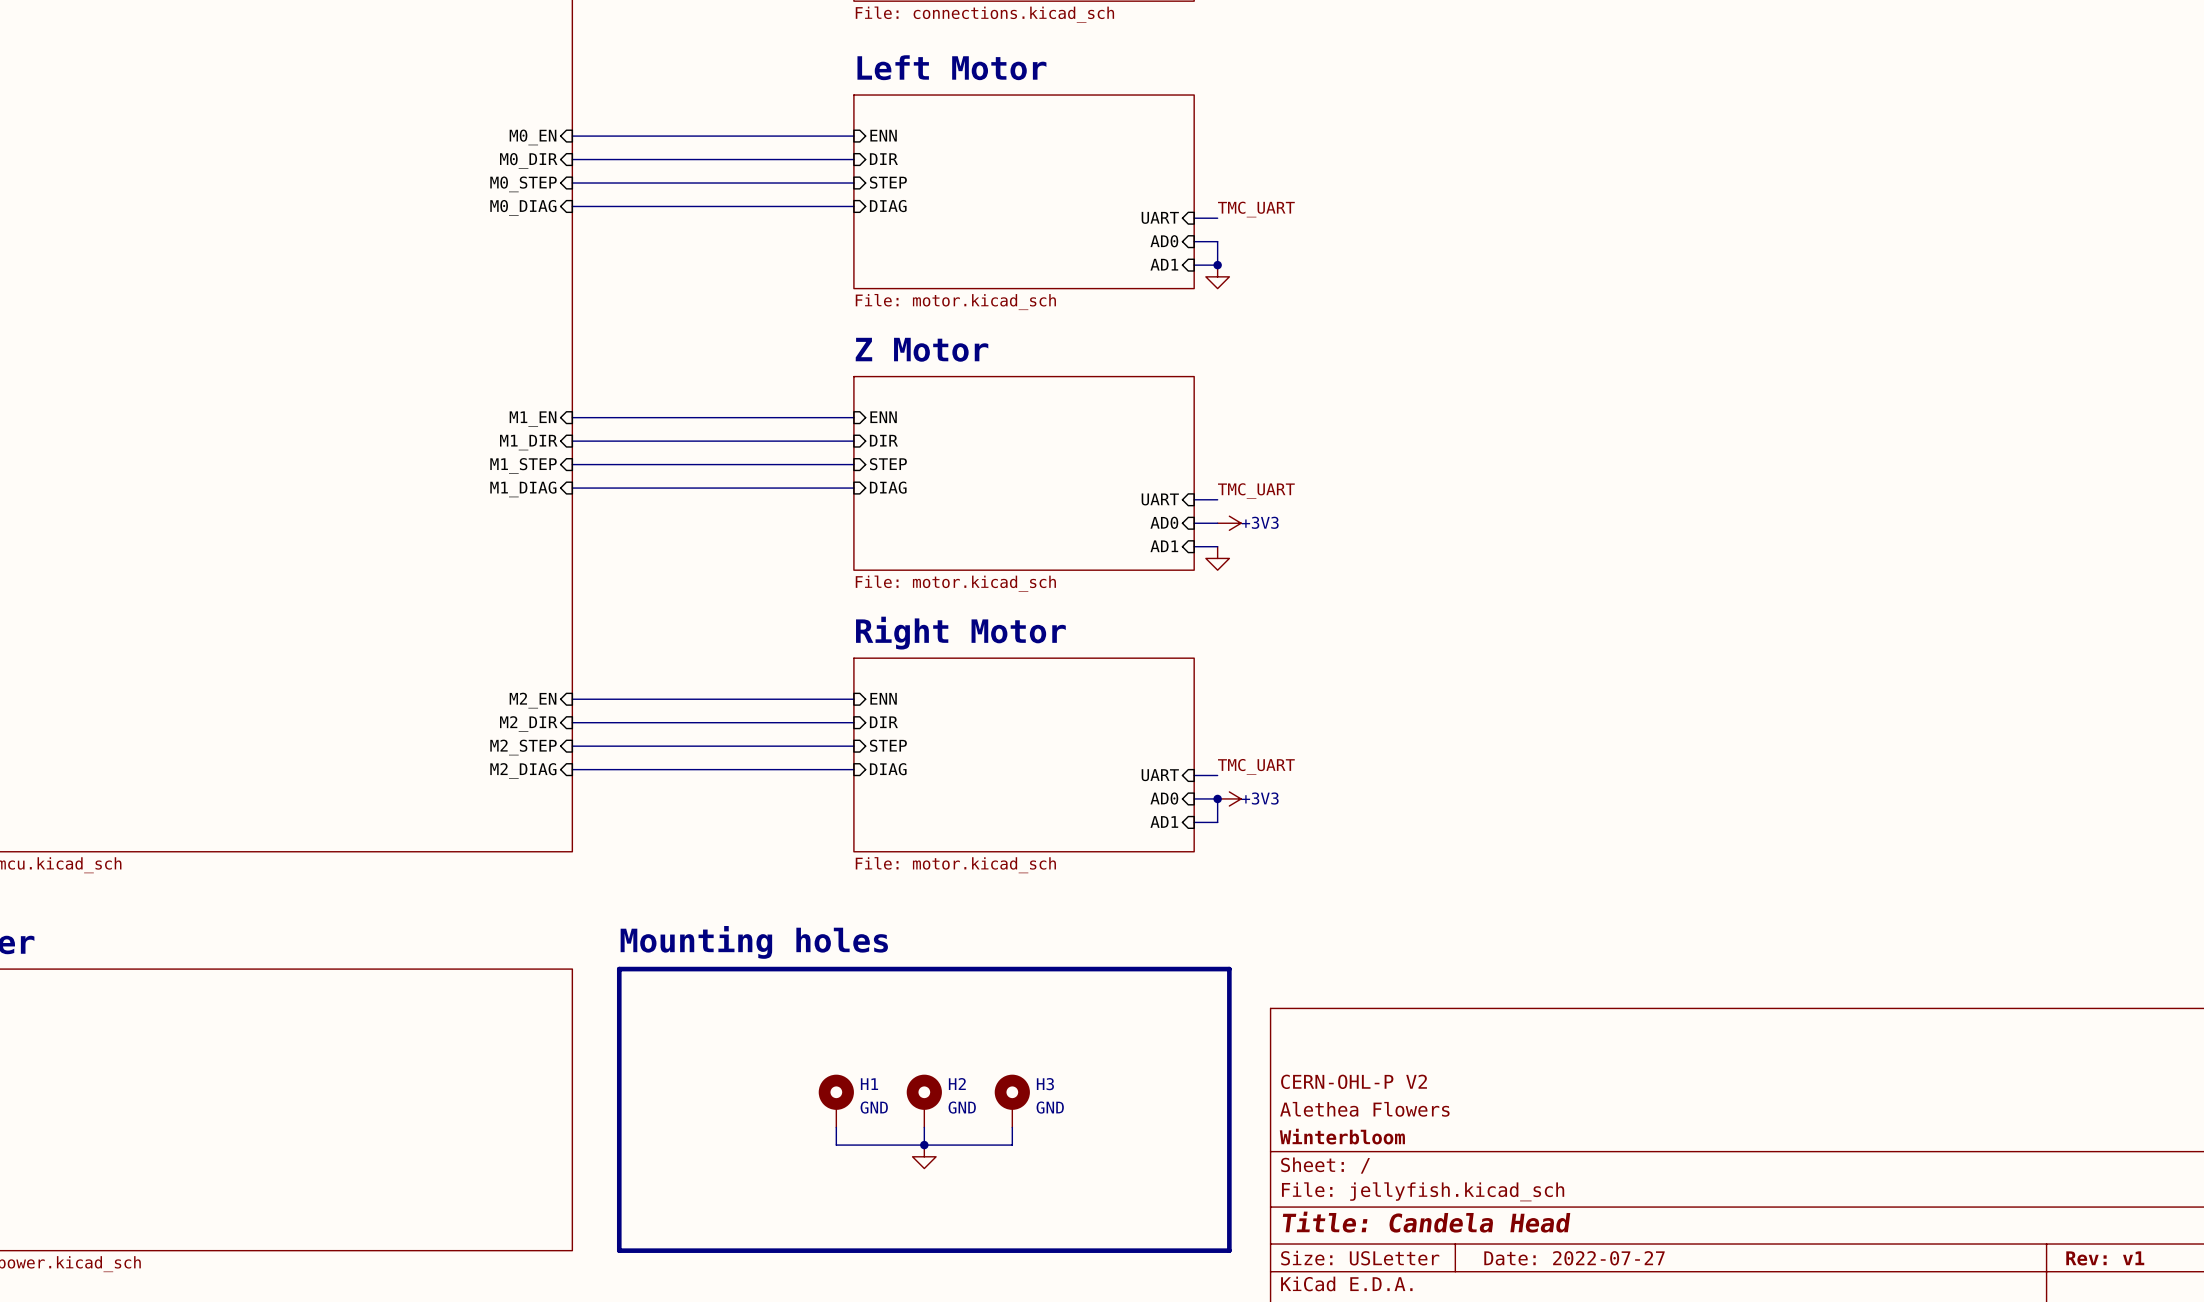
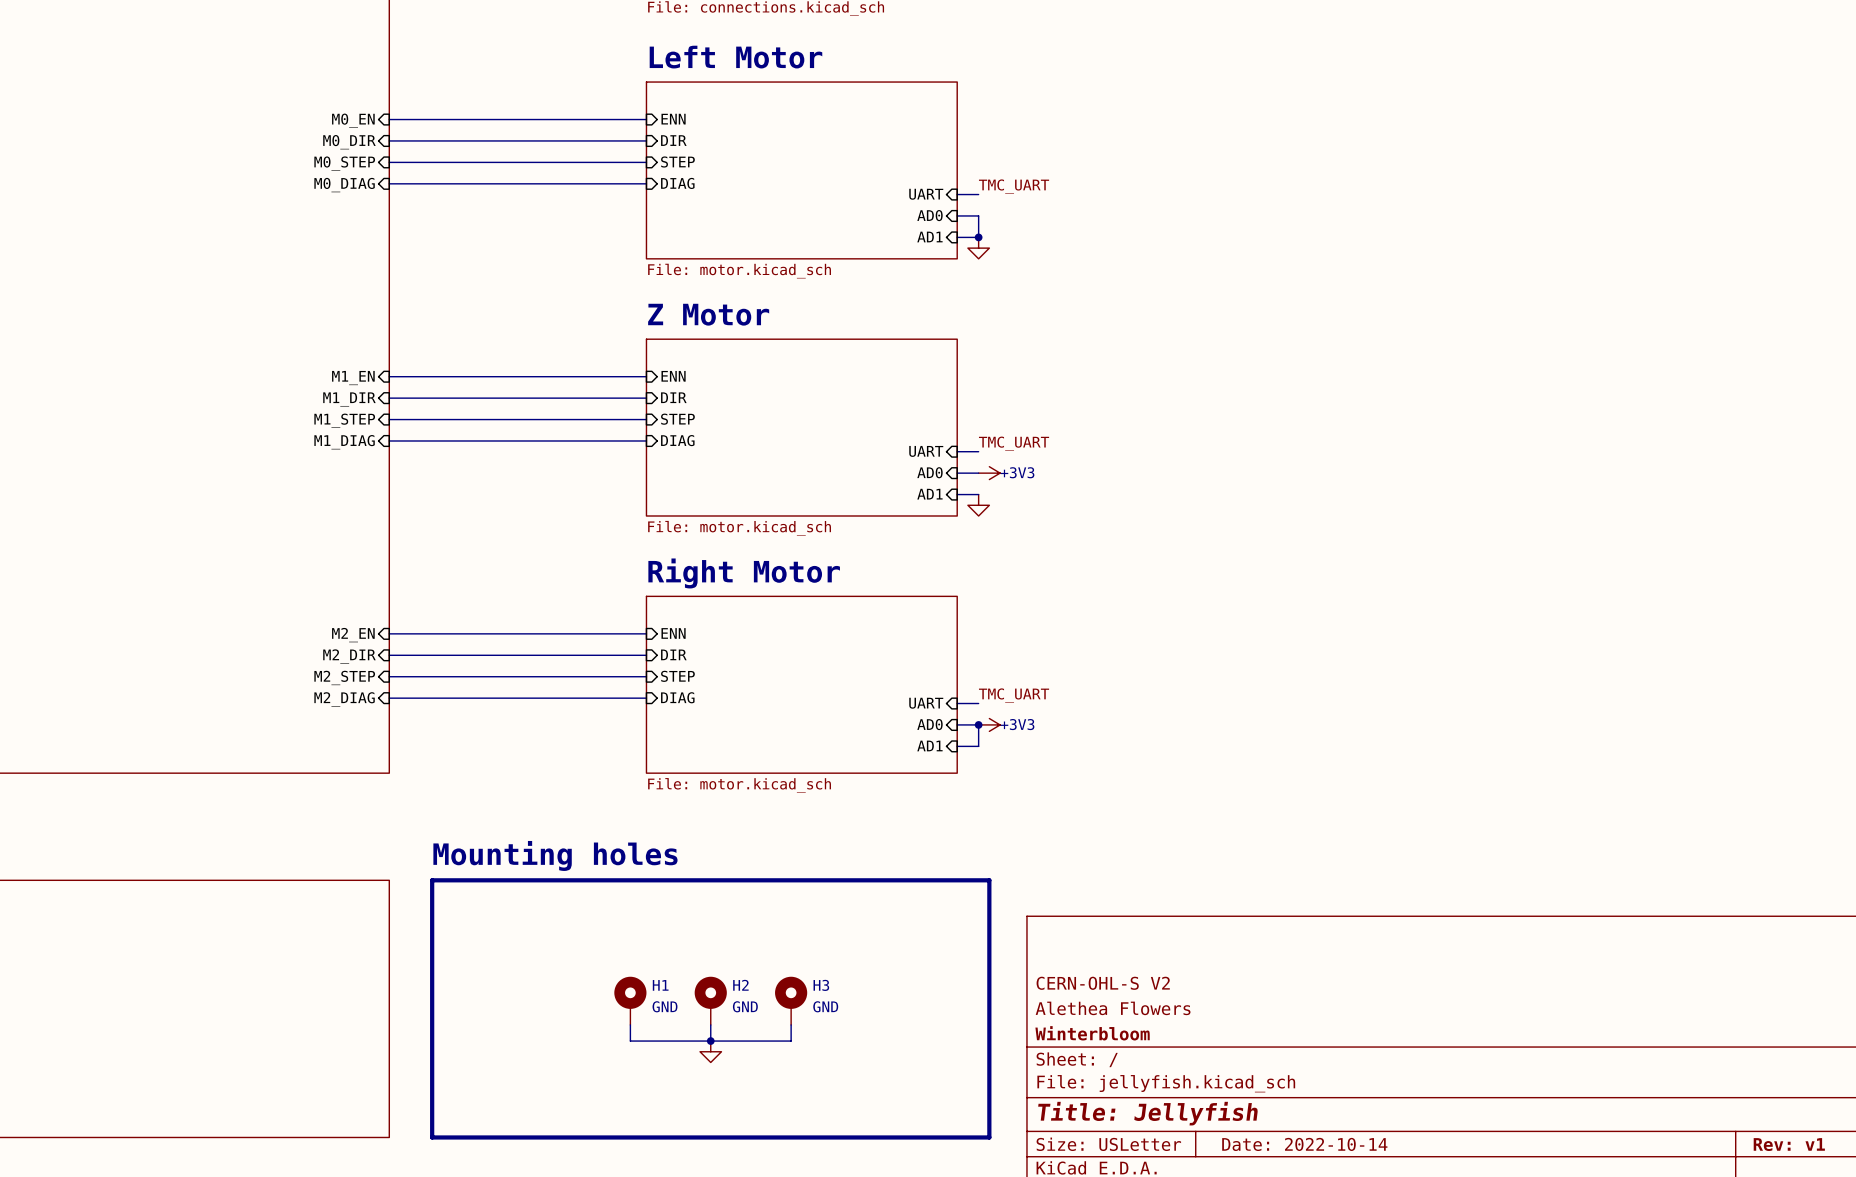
title block: CERN-OHL-P V2 (1354, 1081) -> CERN-OHL-S V2 (1103, 983)
title block: Title: Candela Head (1426, 1222) -> Title: Jellyfish (1148, 1113)
title block: Date: 2022-07-27 (1574, 1258) -> Date: 2022-10-14 (1304, 1144)

